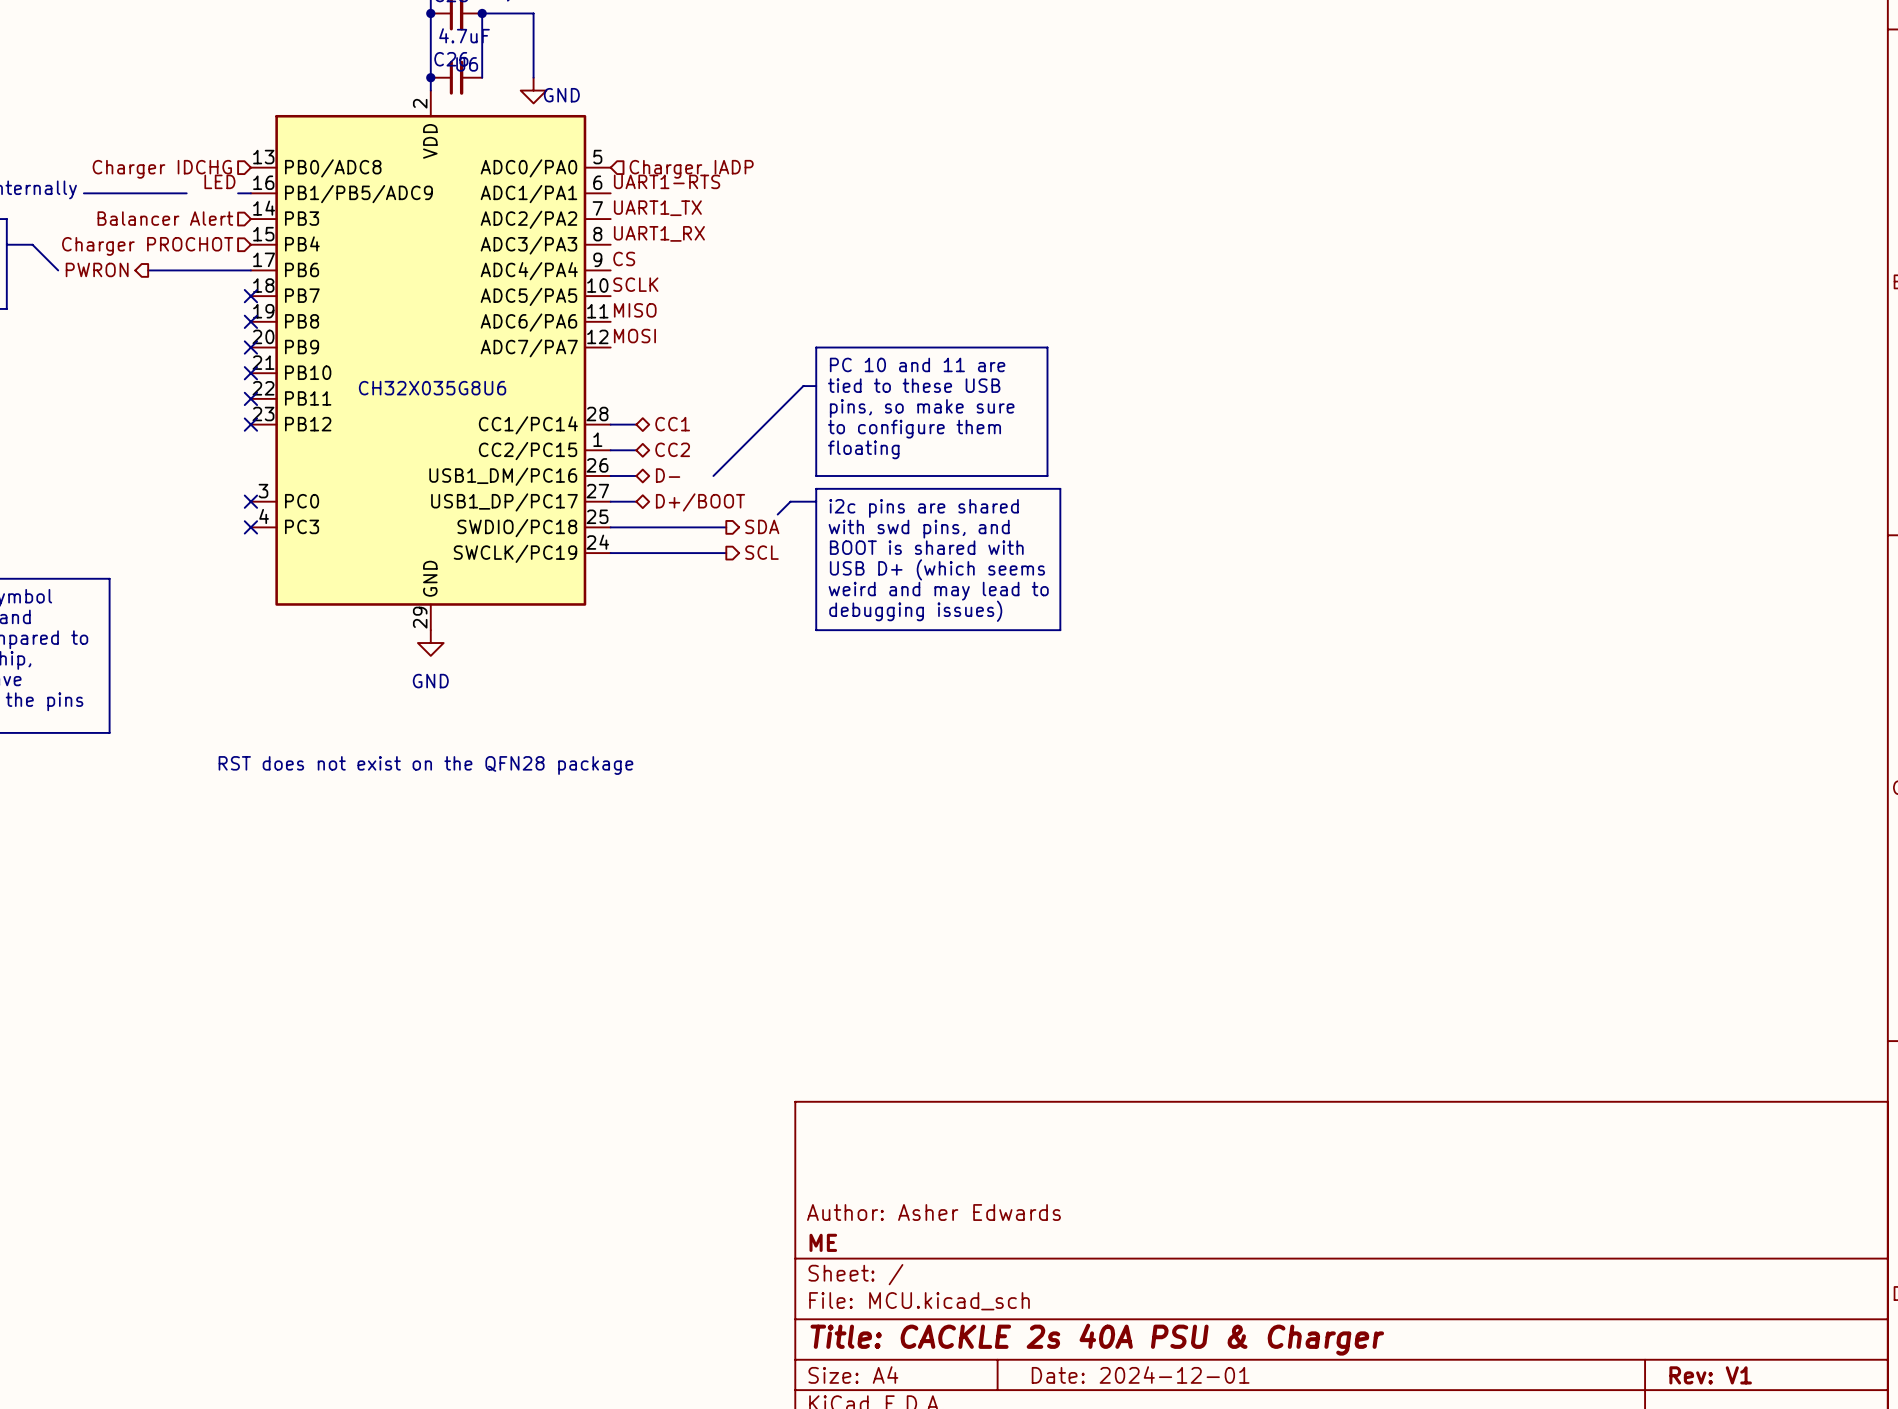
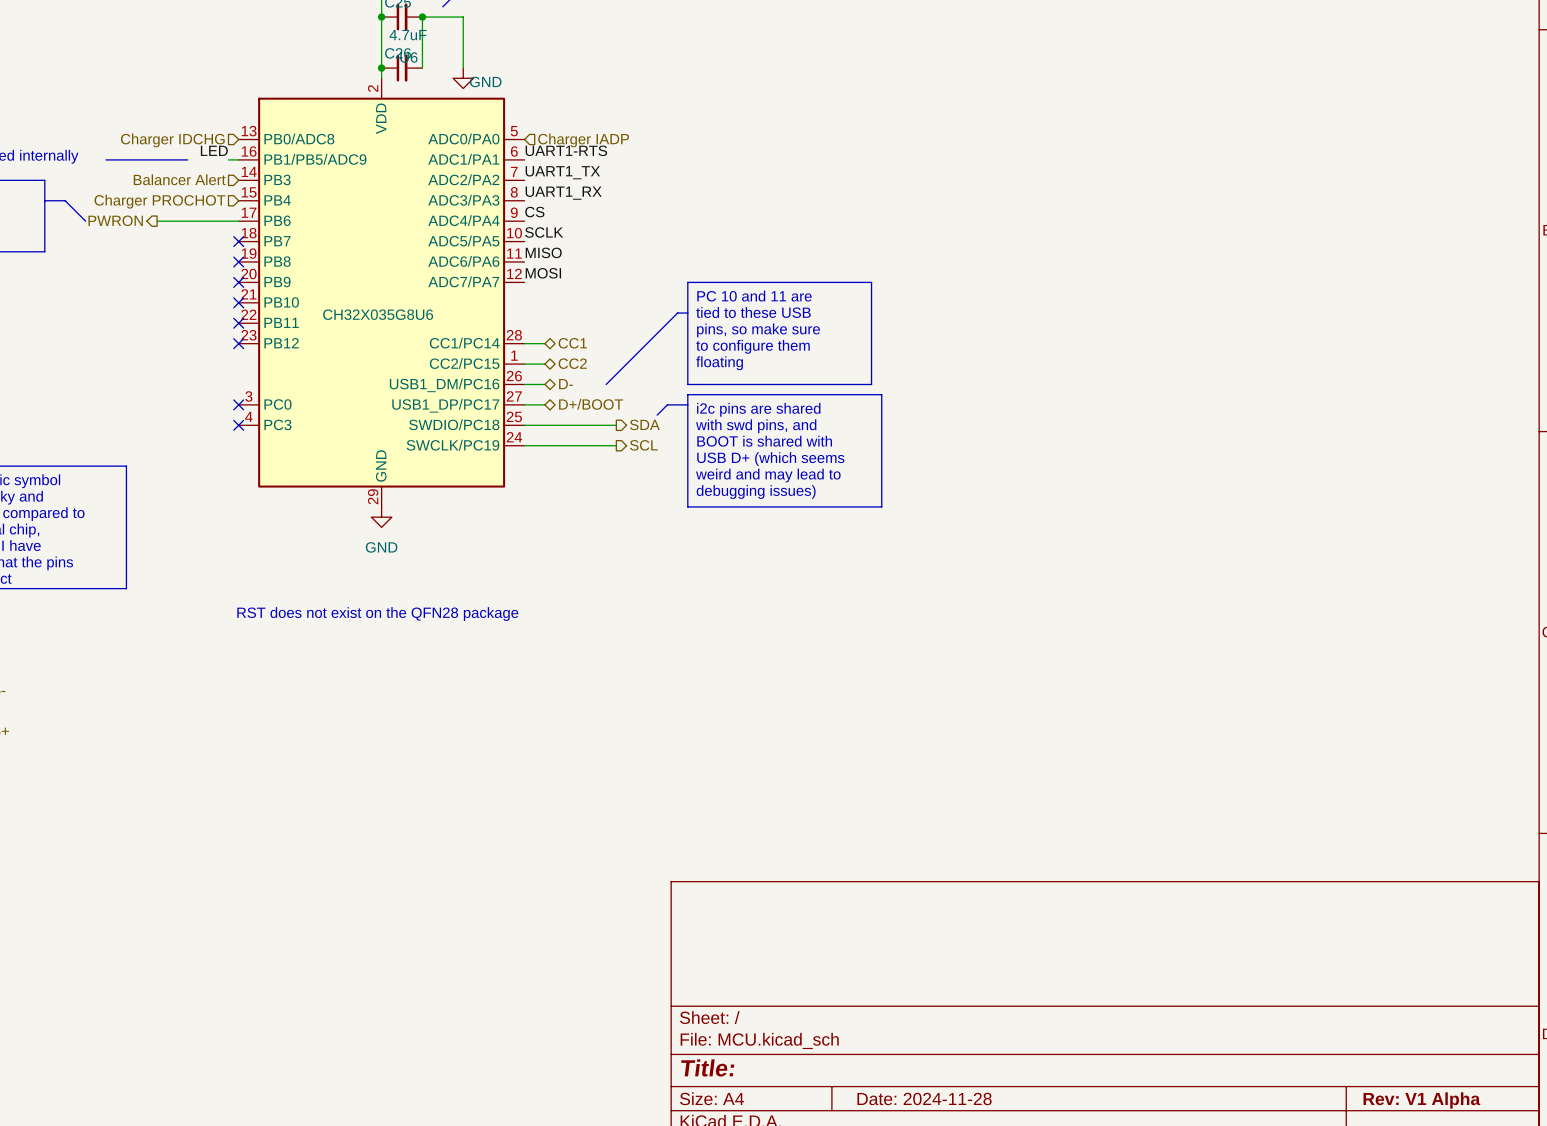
title block: Author: Asher Edwards (933, 1212) -> none
title block: ME (823, 1242) -> none
title block: Title: CACKLE 2s 40A PSU & Charger (1097, 1339) -> Title: (707, 1067)
title block: Date: 2024-12-01 (1140, 1375) -> Date: 2024-11-28 (924, 1098)
title block: Rev: V1 (1710, 1375) -> Rev: V1 Alpha (1421, 1100)

